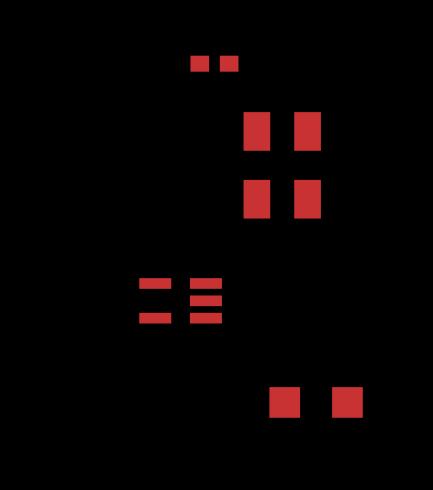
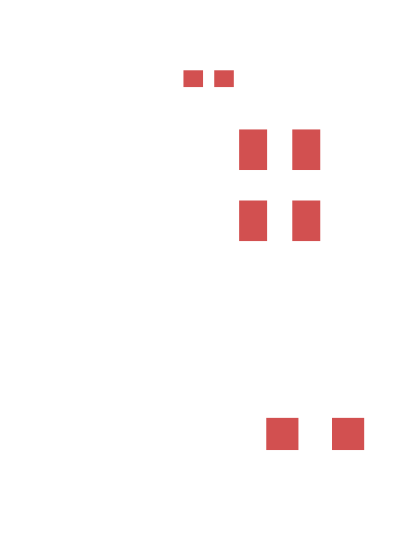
part: (180, 300) -> none

